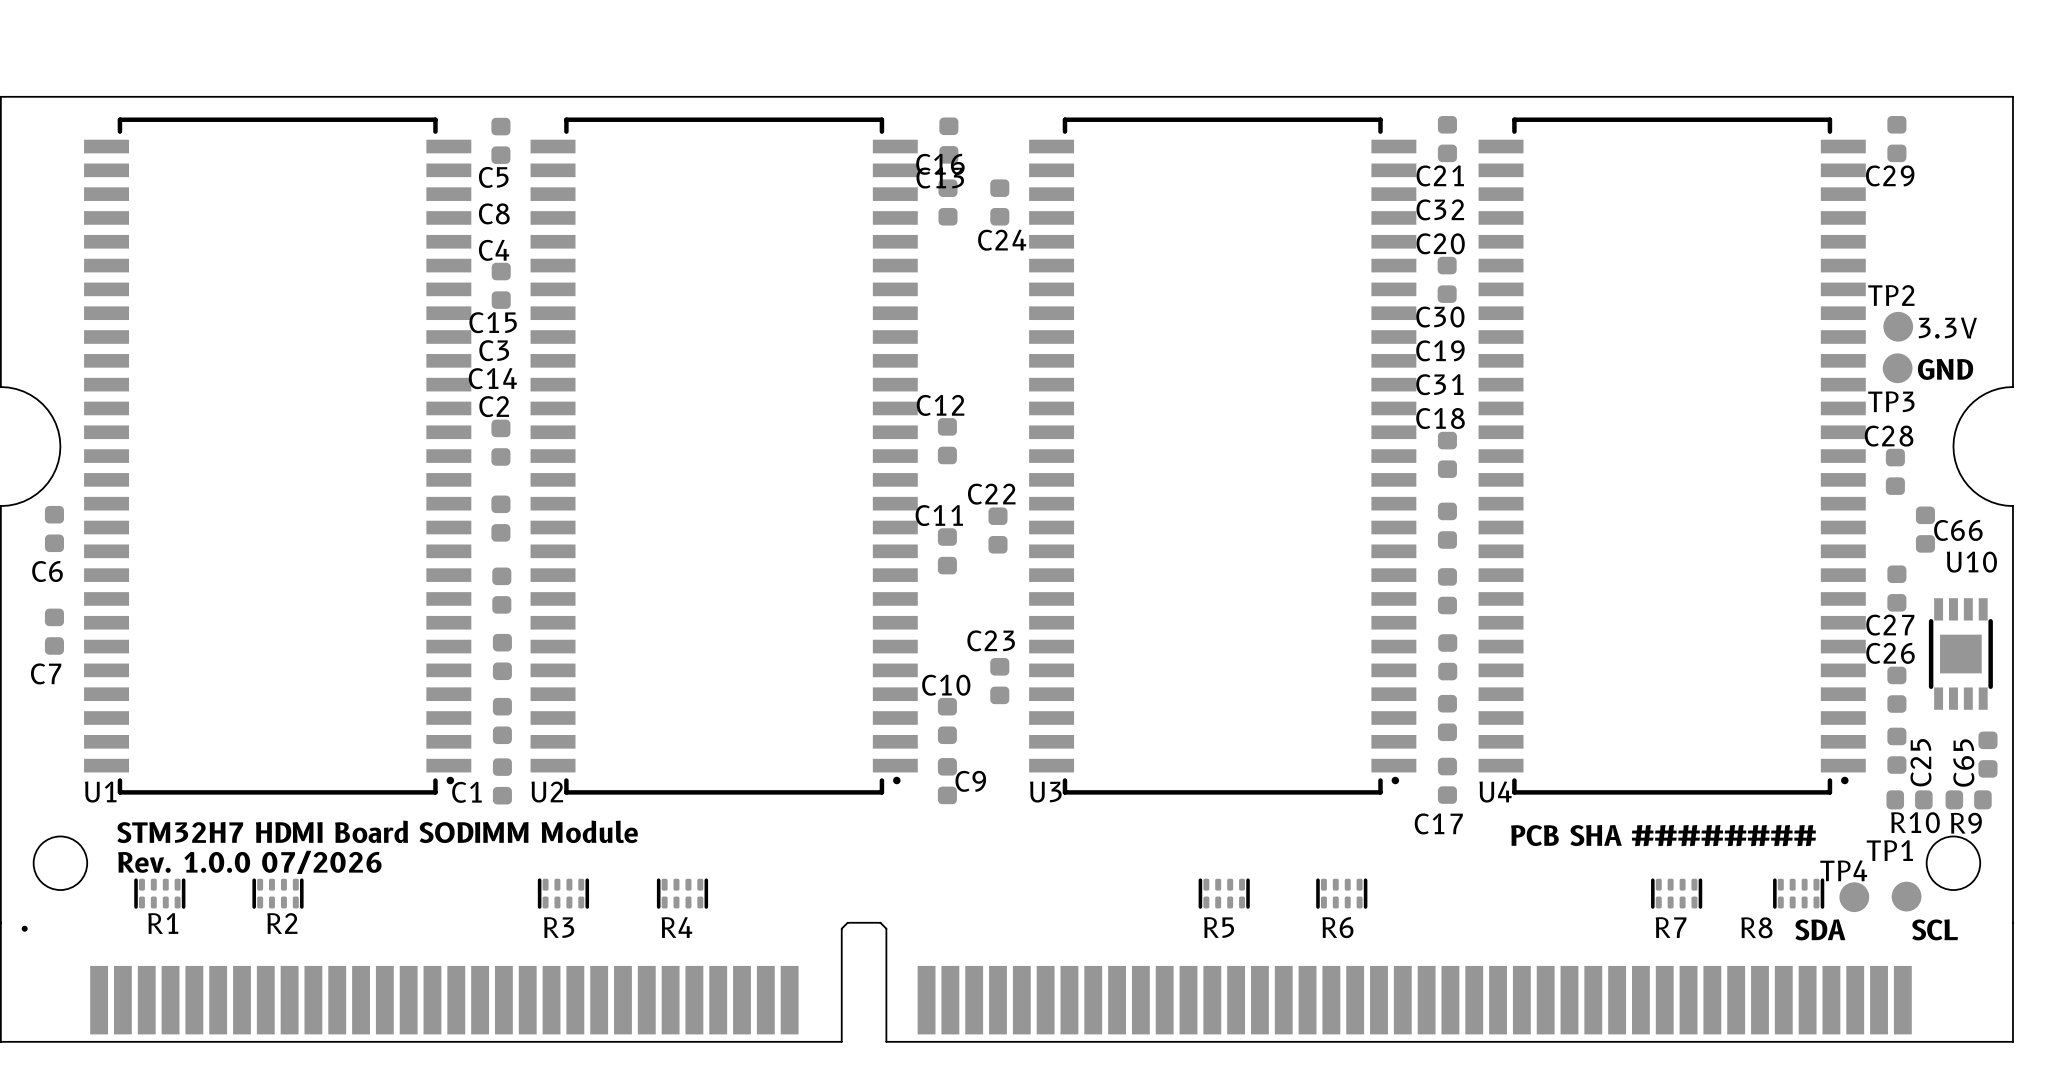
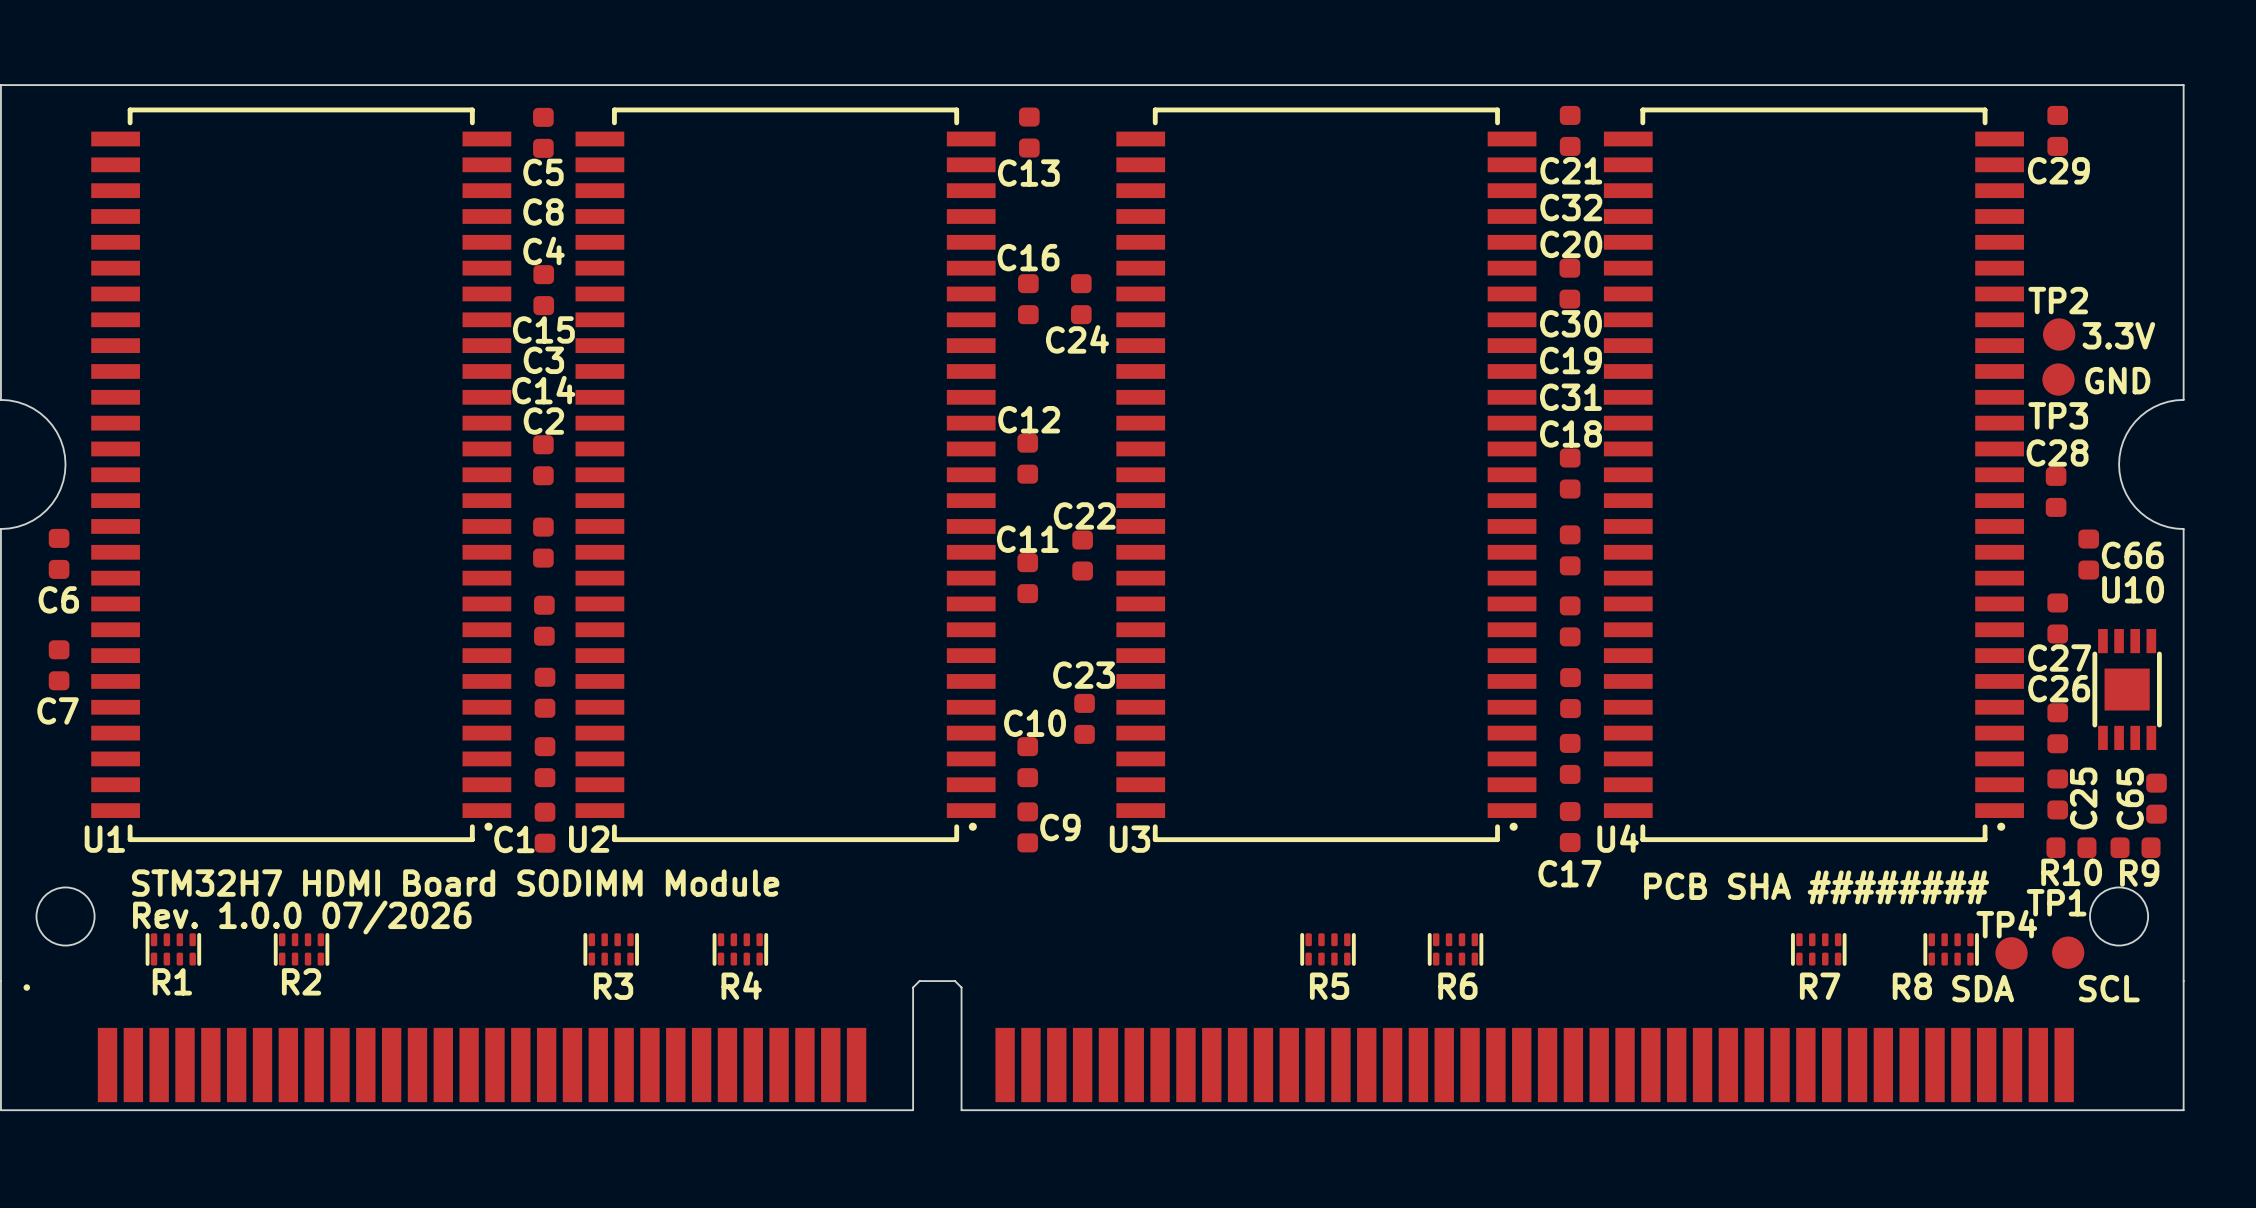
C16 position: (948, 202) -> (1028, 299)
C24 position: (999, 202) -> (1081, 299)

